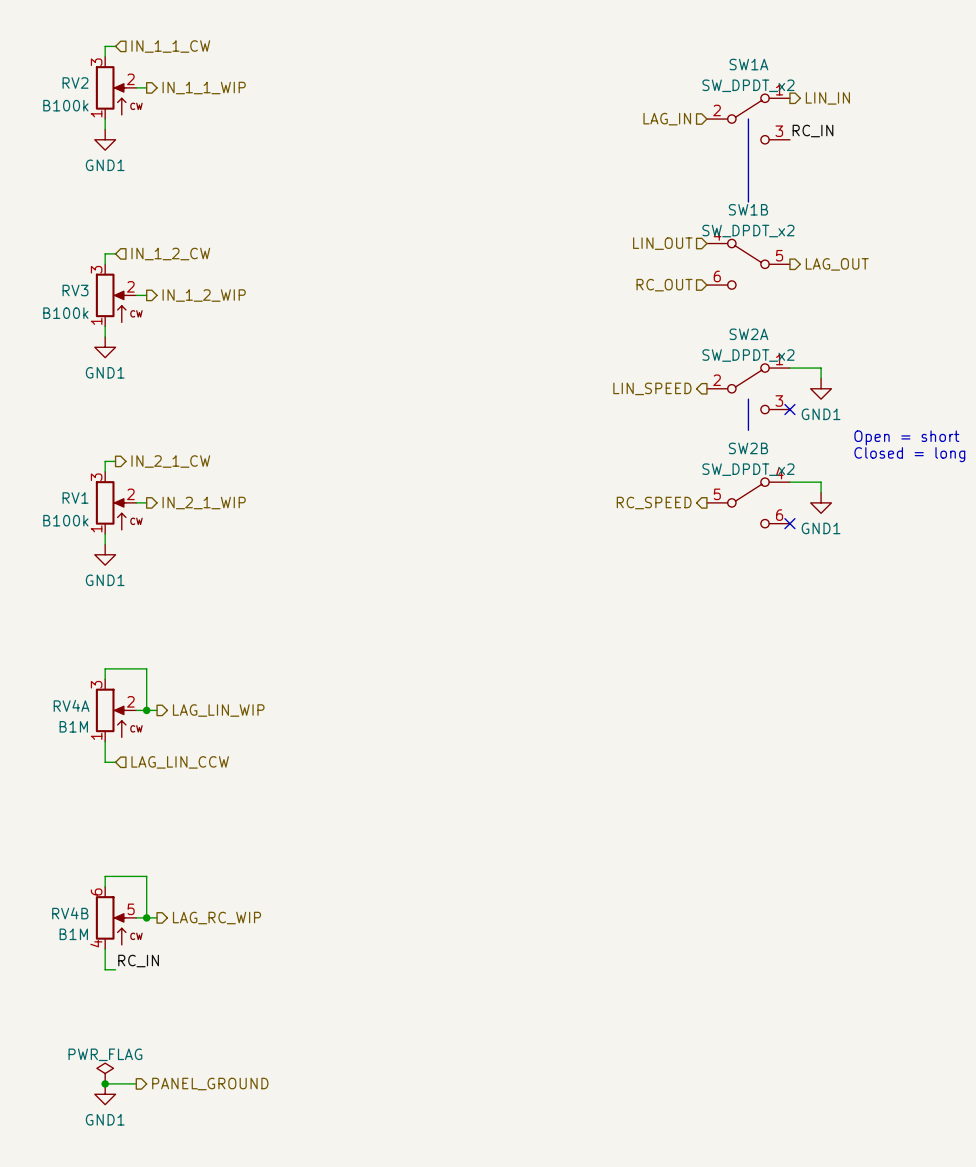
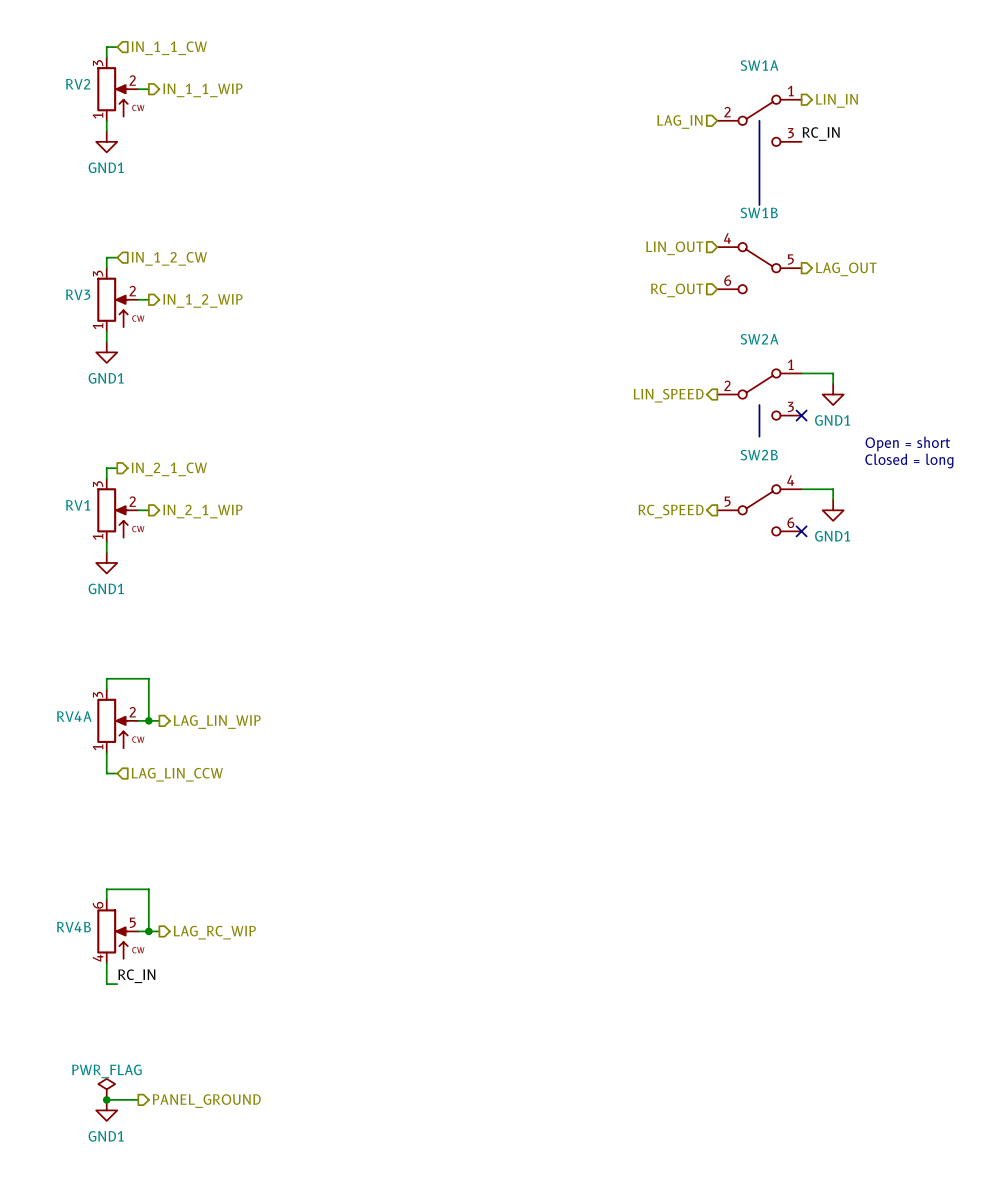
SW1A value: SW_DPDT_x2 (748, 85) -> none
RV2 value: B100k (65, 105) -> none
SW1B value: SW_DPDT_x2 (748, 231) -> none
RV3 value: B100k (65, 313) -> none
SW2A value: SW_DPDT_x2 (748, 355) -> none
SW2B value: SW_DPDT_x2 (748, 469) -> none
RV1 value: B100k (65, 520) -> none
RV4A value: B1M (73, 726) -> none
RV4B value: B1M (73, 934) -> none

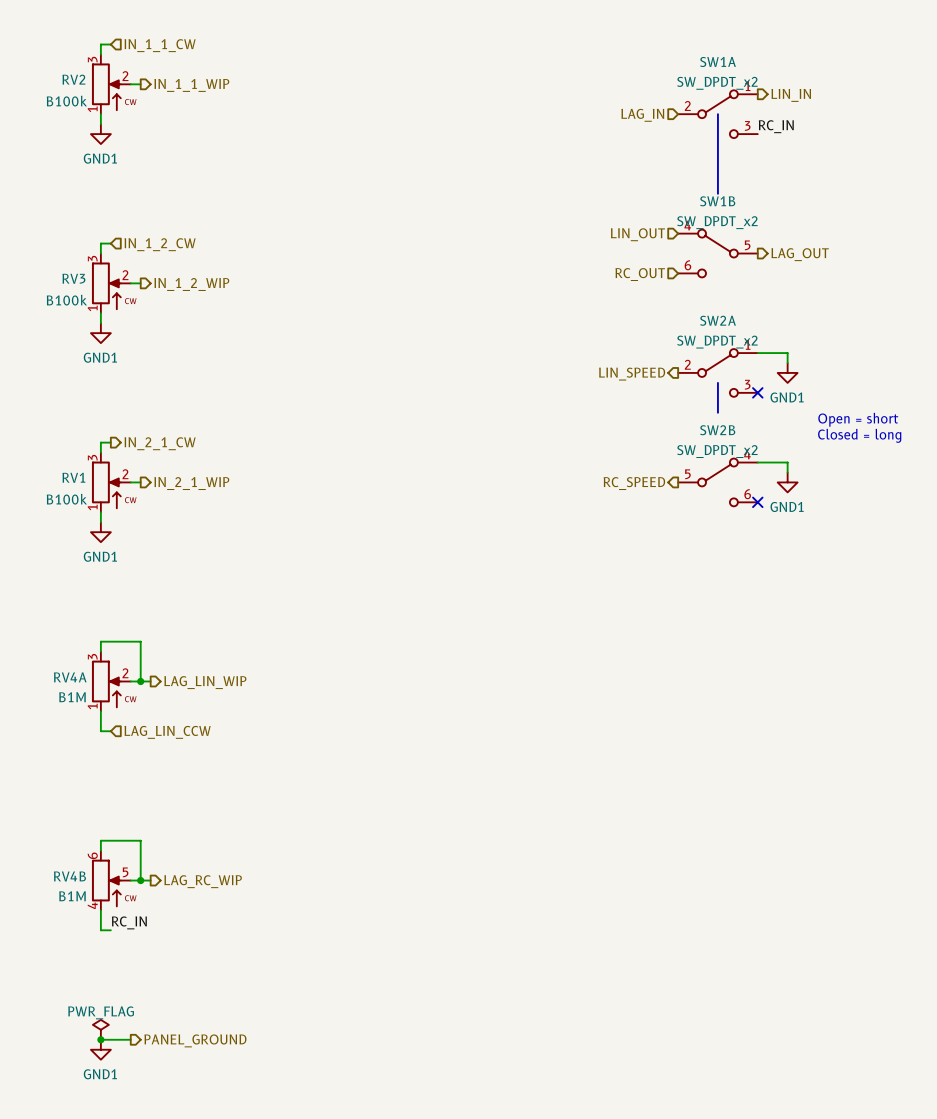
SW1A value: none -> SW_DPDT_x2 (717, 83)
RV2 value: none -> B100k (66, 101)
SW1B value: none -> SW_DPDT_x2 (717, 222)
RV3 value: none -> B100k (66, 300)
SW2A value: none -> SW_DPDT_x2 (717, 342)
SW2B value: none -> SW_DPDT_x2 (717, 451)
RV1 value: none -> B100k (66, 499)
RV4A value: none -> B1M (72, 697)
RV4B value: none -> B1M (72, 896)

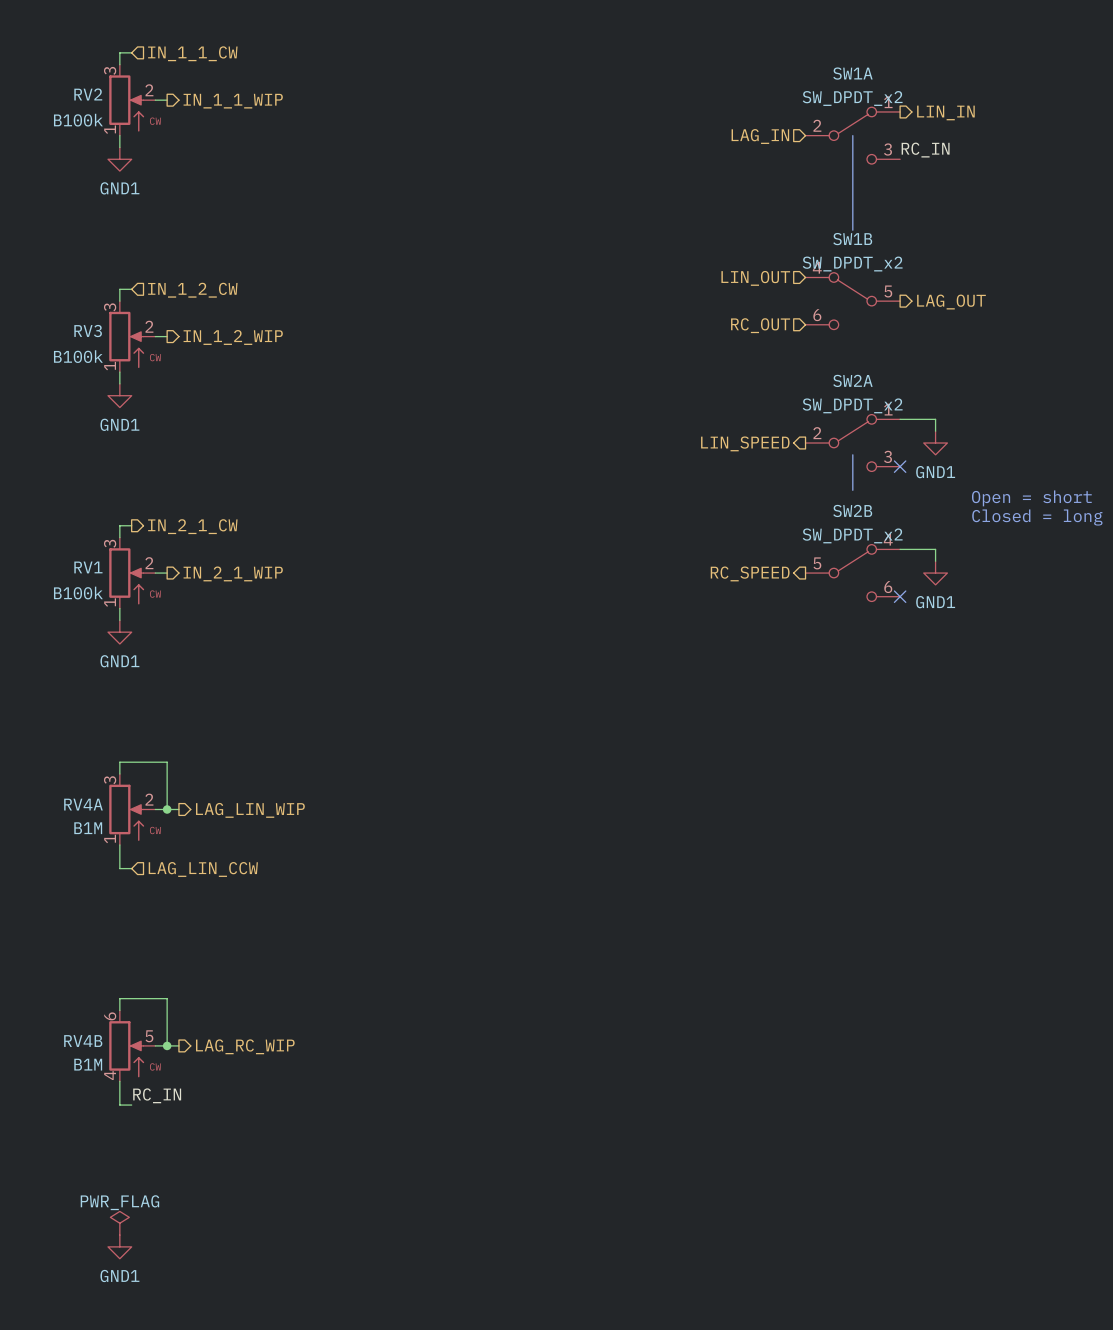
wire: (100, 1039) (130, 1039) -> none
junction: (100, 1039) -> none
hierarchical label: PANEL_GROUND (195, 1040) -> none

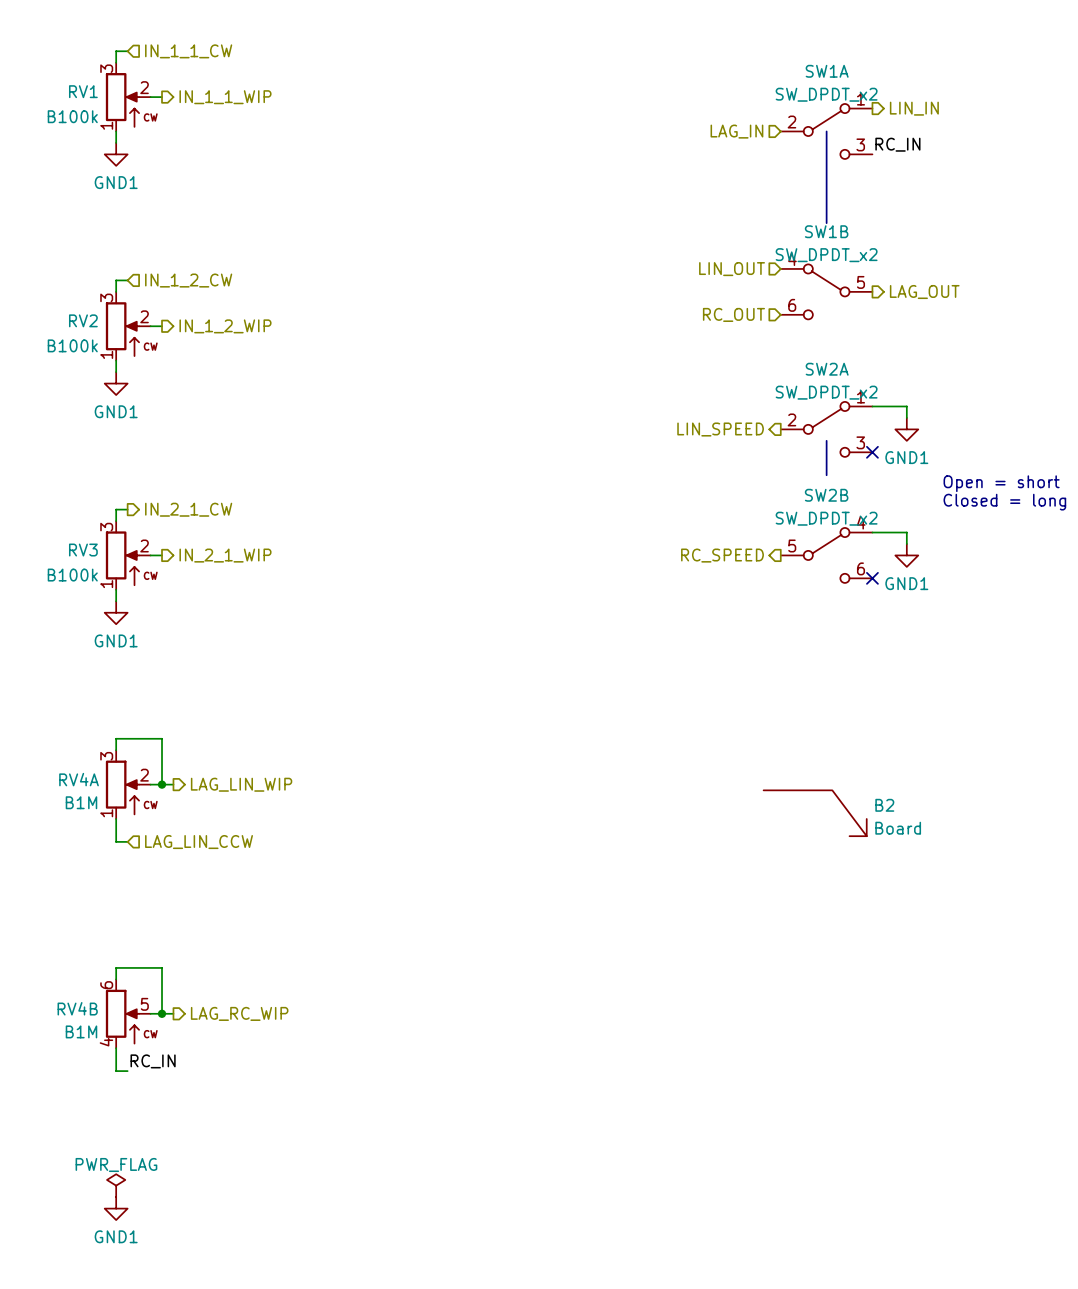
RV2 name: RV2 (88, 94) -> RV1 (83, 91)
RV3 name: RV3 (88, 331) -> RV2 (83, 320)
RV1 name: RV1 (88, 567) -> RV3 (83, 550)
B2: none -> Board (815, 813)

